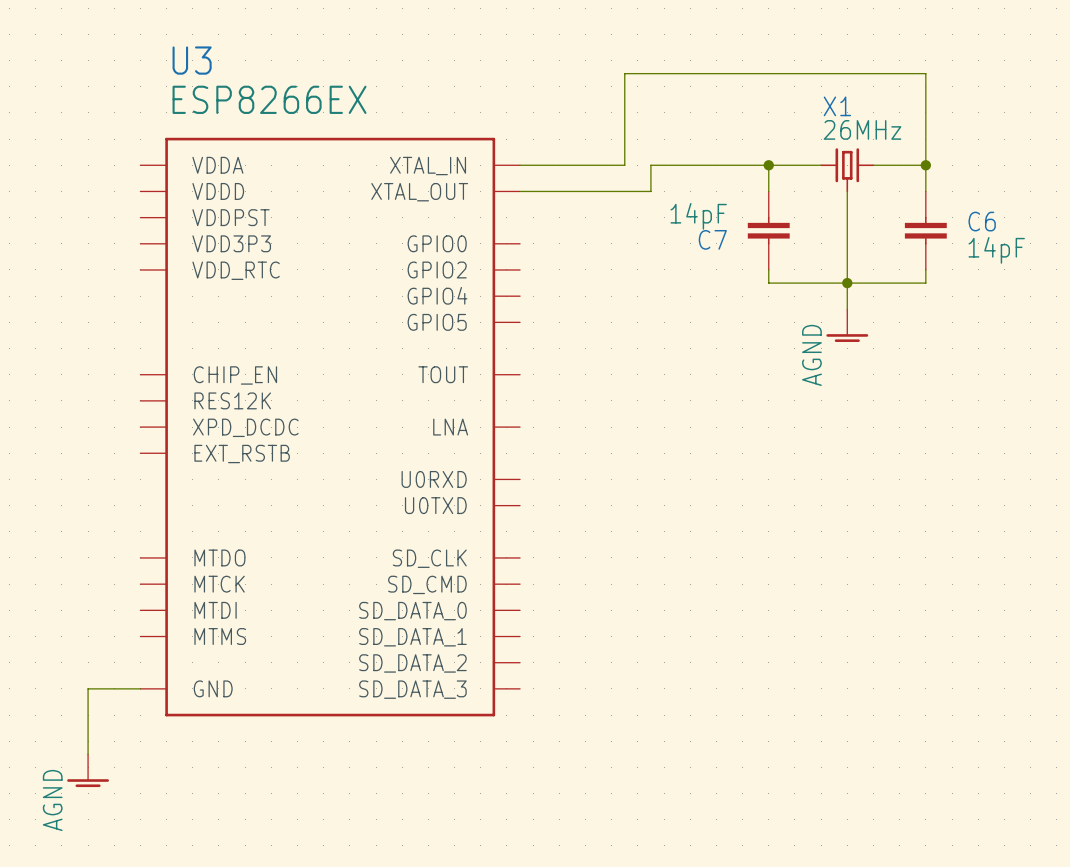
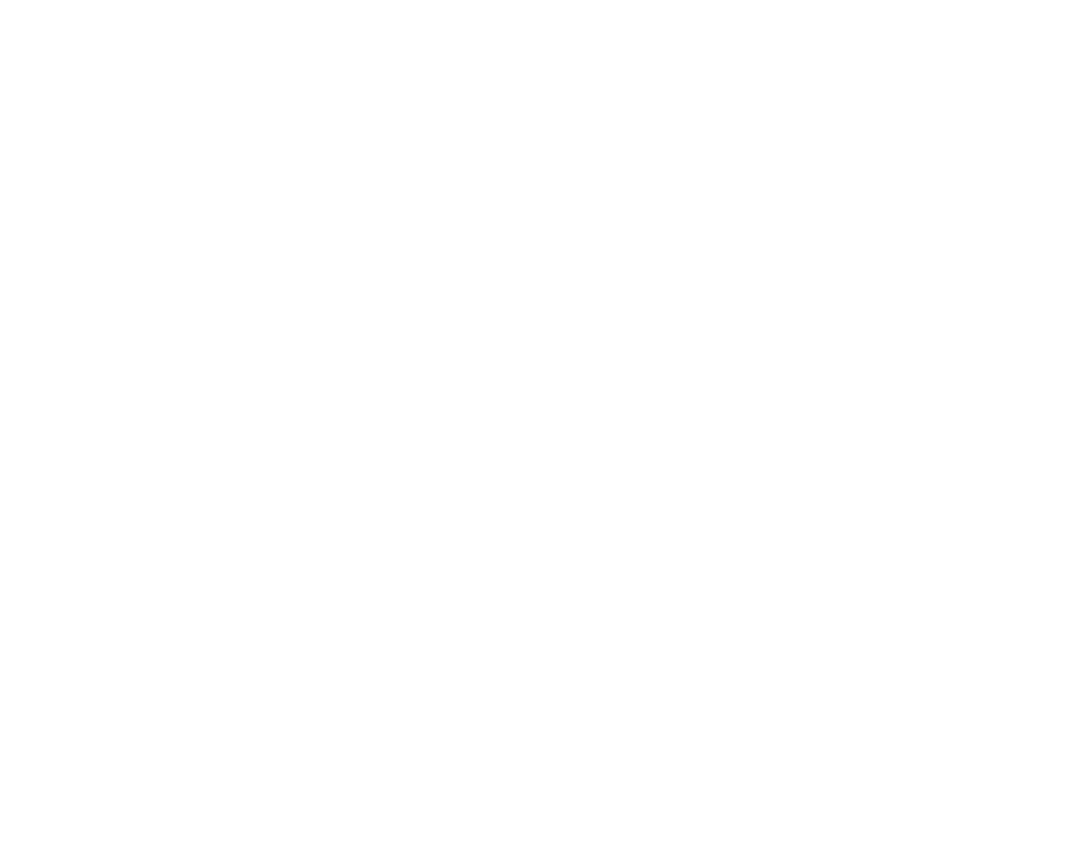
wire: (520, 165) (624, 165) (624, 73) (925, 73) (925, 191) -> none
wire: (768, 165) (768, 191) -> none
junction: (768, 165) -> none
wire: (821, 165) (650, 165) (650, 191) (520, 191) -> none
wire: (873, 165) (925, 165) -> none
junction: (925, 165) -> none
X1: 26MHz (847, 170) -> none
wire: (847, 191) (847, 309) -> none
C7: 14pF (768, 230) -> none
C6: 14pF (925, 230) -> none
wire: (768, 269) (768, 283) (925, 283) (925, 269) -> none
junction: (847, 283) -> none
power symbol: AGND (847, 325) -> none
U3: ESP8266EX (330, 427) -> none
wire: (140, 688) (88, 688) (88, 754) -> none
power symbol: AGND (88, 770) -> none

